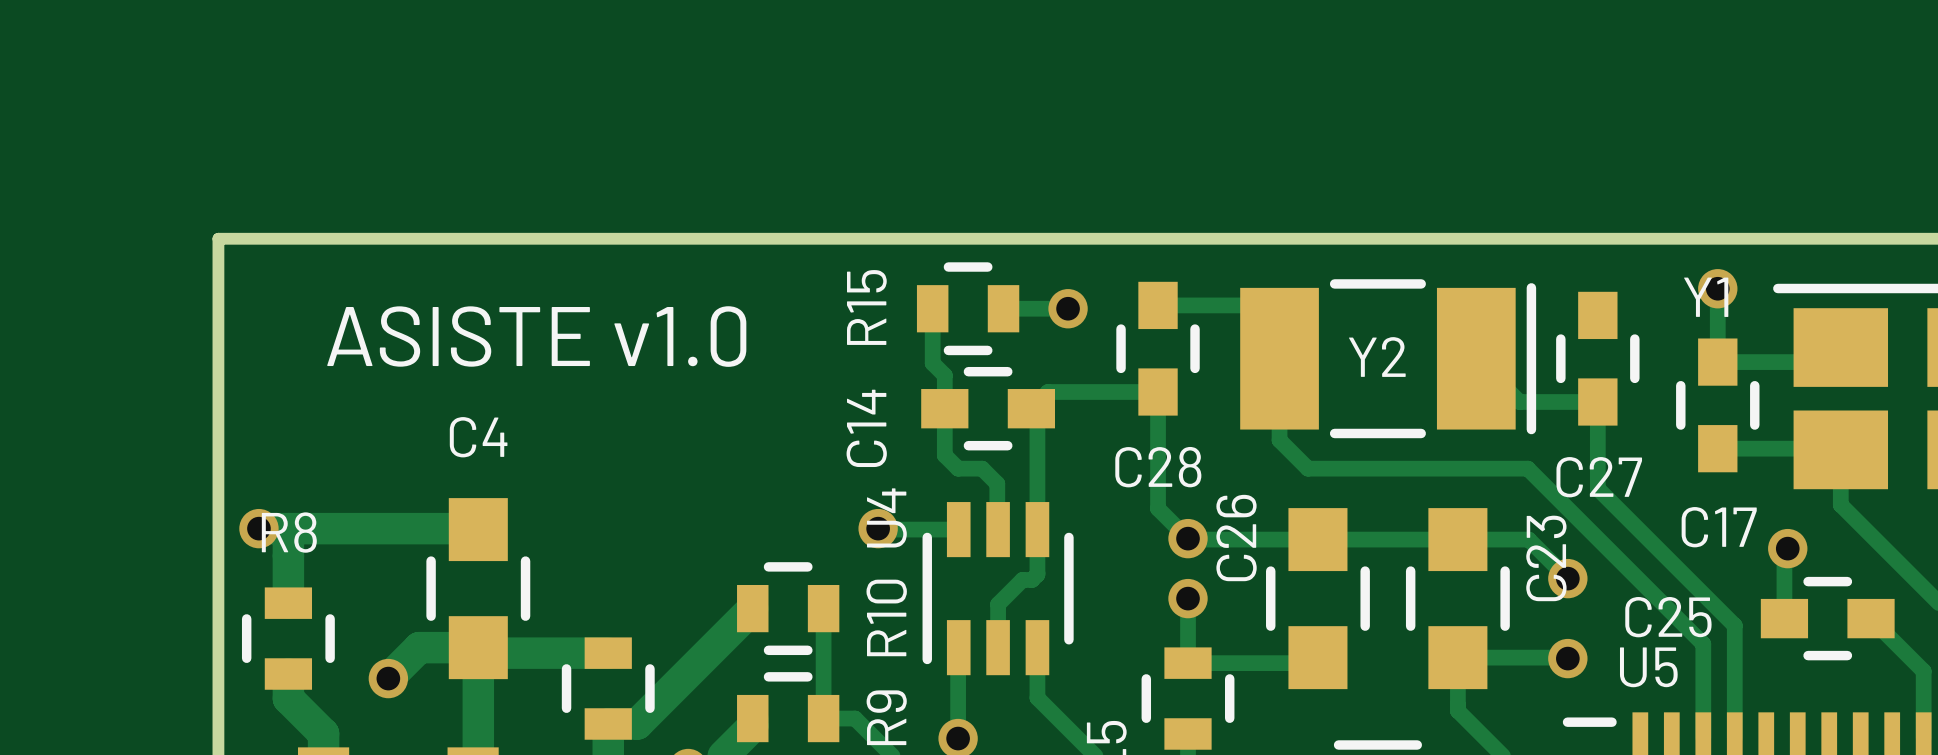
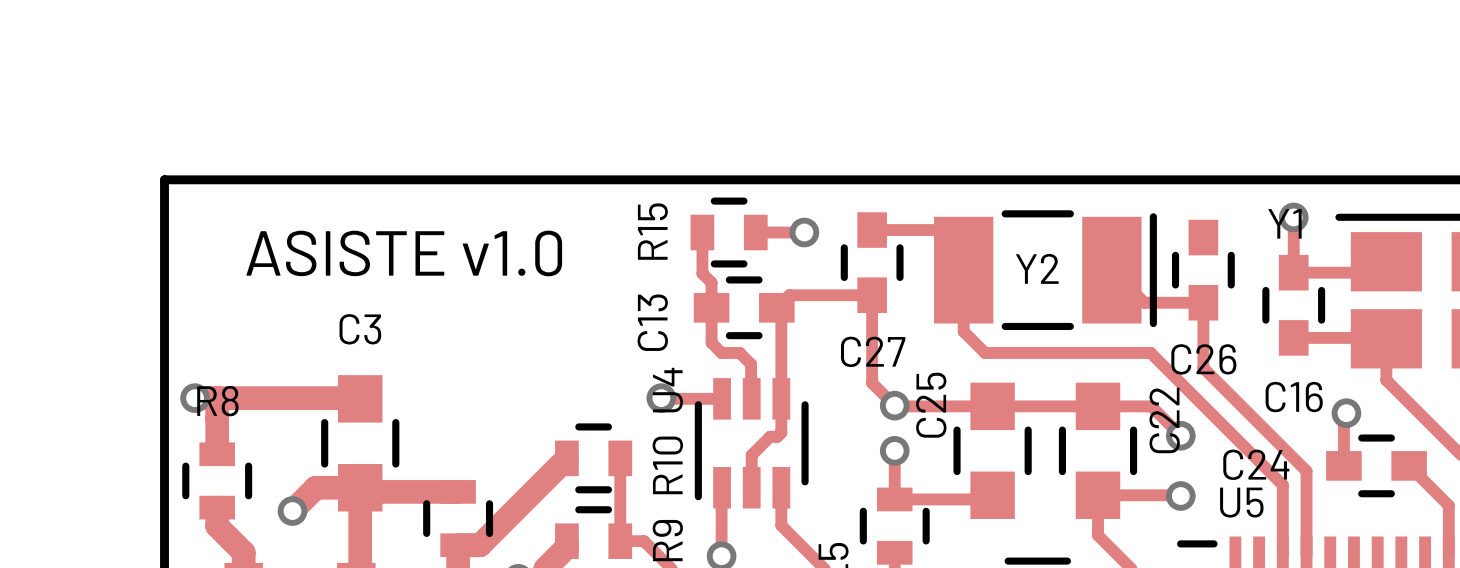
C14 name: C14 (866, 428) -> C13 (652, 322)
C4 name: C4 (478, 437) -> C3 (360, 329)
C28 name: C28 (1158, 467) -> C27 (873, 351)
C27 name: C27 (1599, 477) -> C26 (1203, 359)
C17 name: C17 (1719, 527) -> C16 (1294, 397)
C26 name: C26 (1236, 538) -> C25 (931, 405)
C23 name: C23 (1546, 558) -> C22 (1164, 420)
C25 name: C25 (1668, 617) -> C24 (1256, 464)

